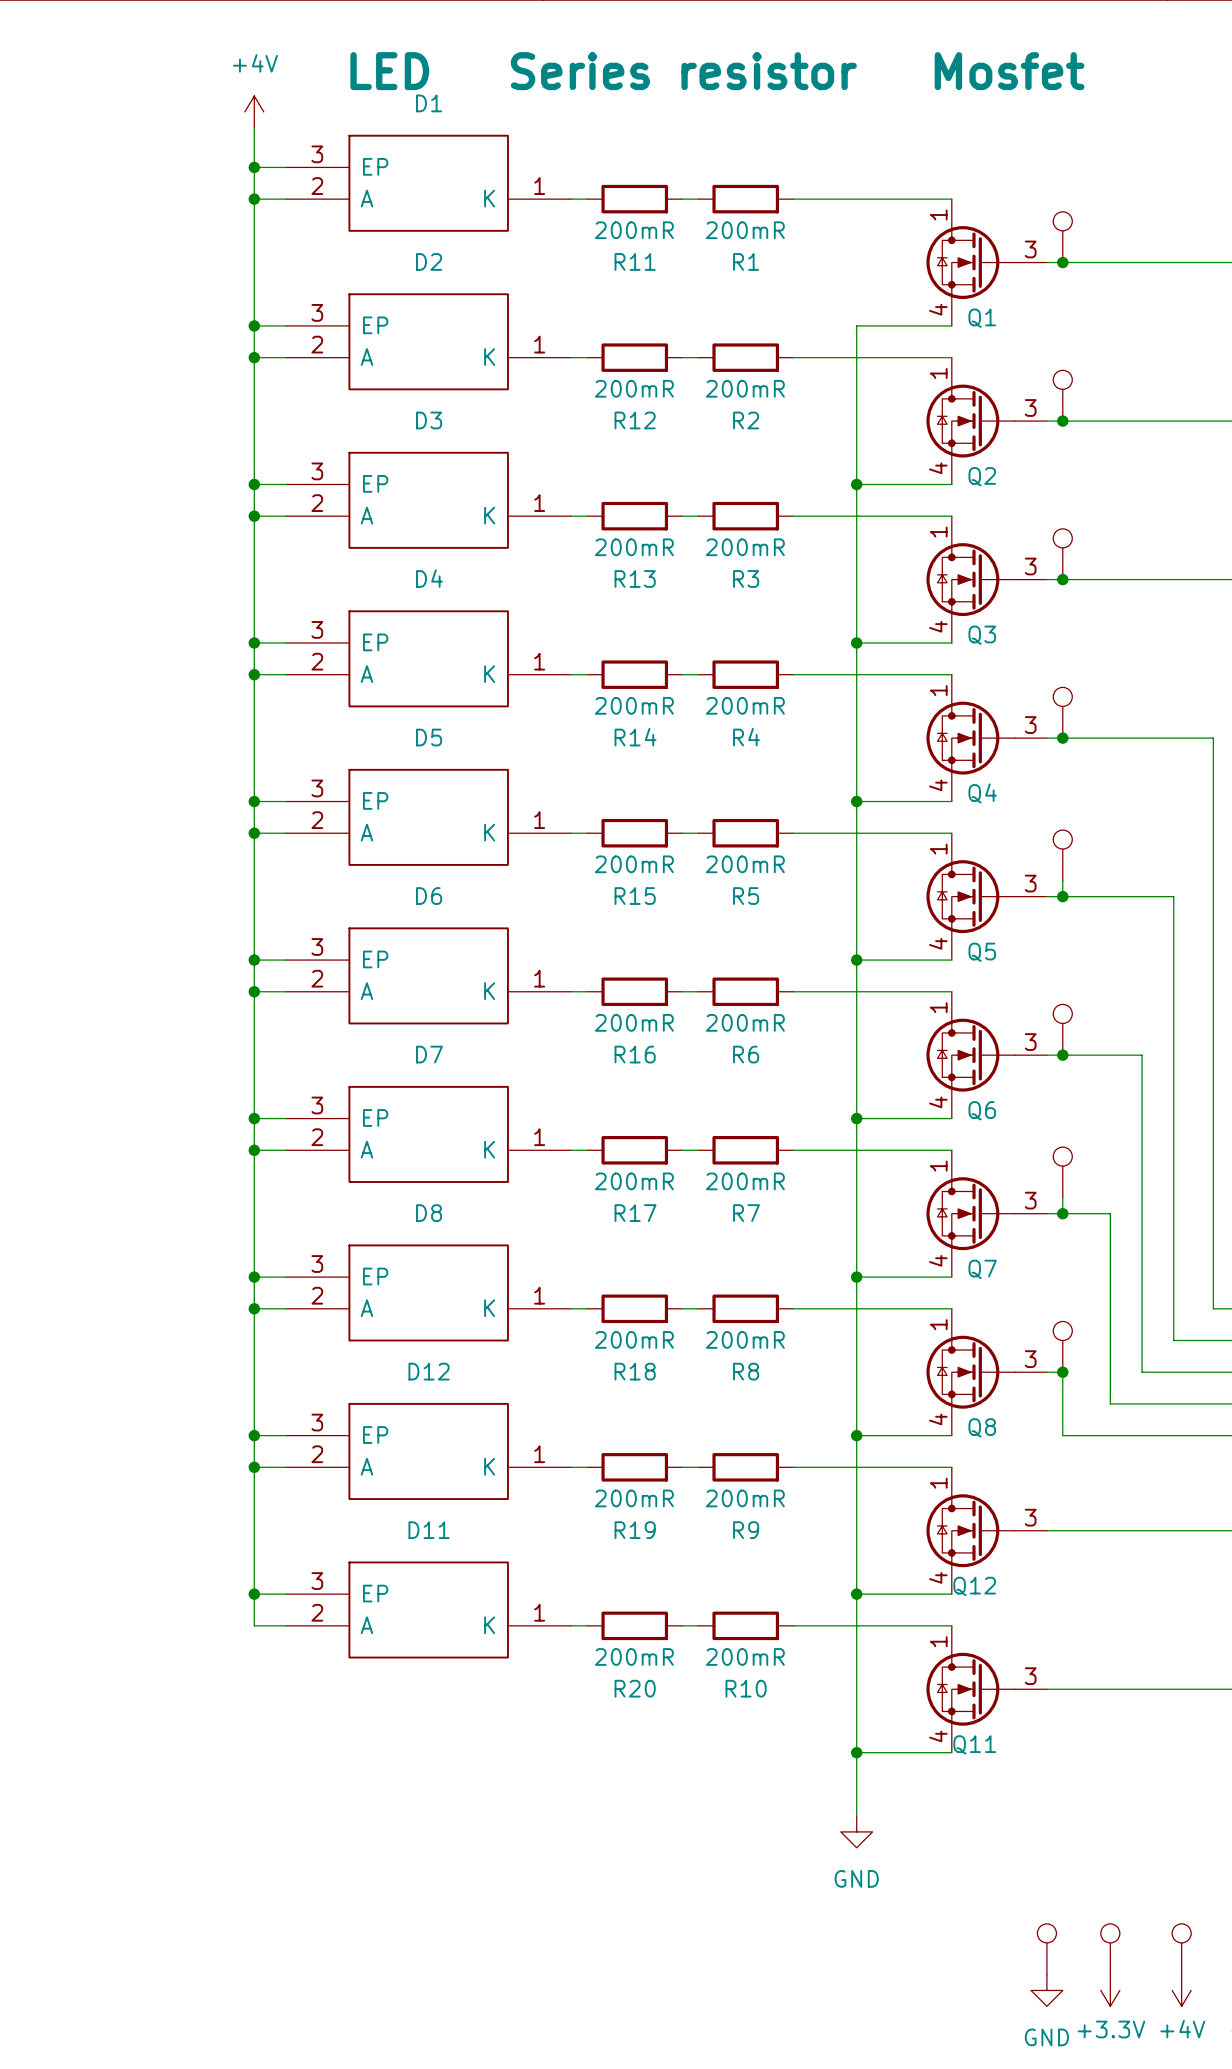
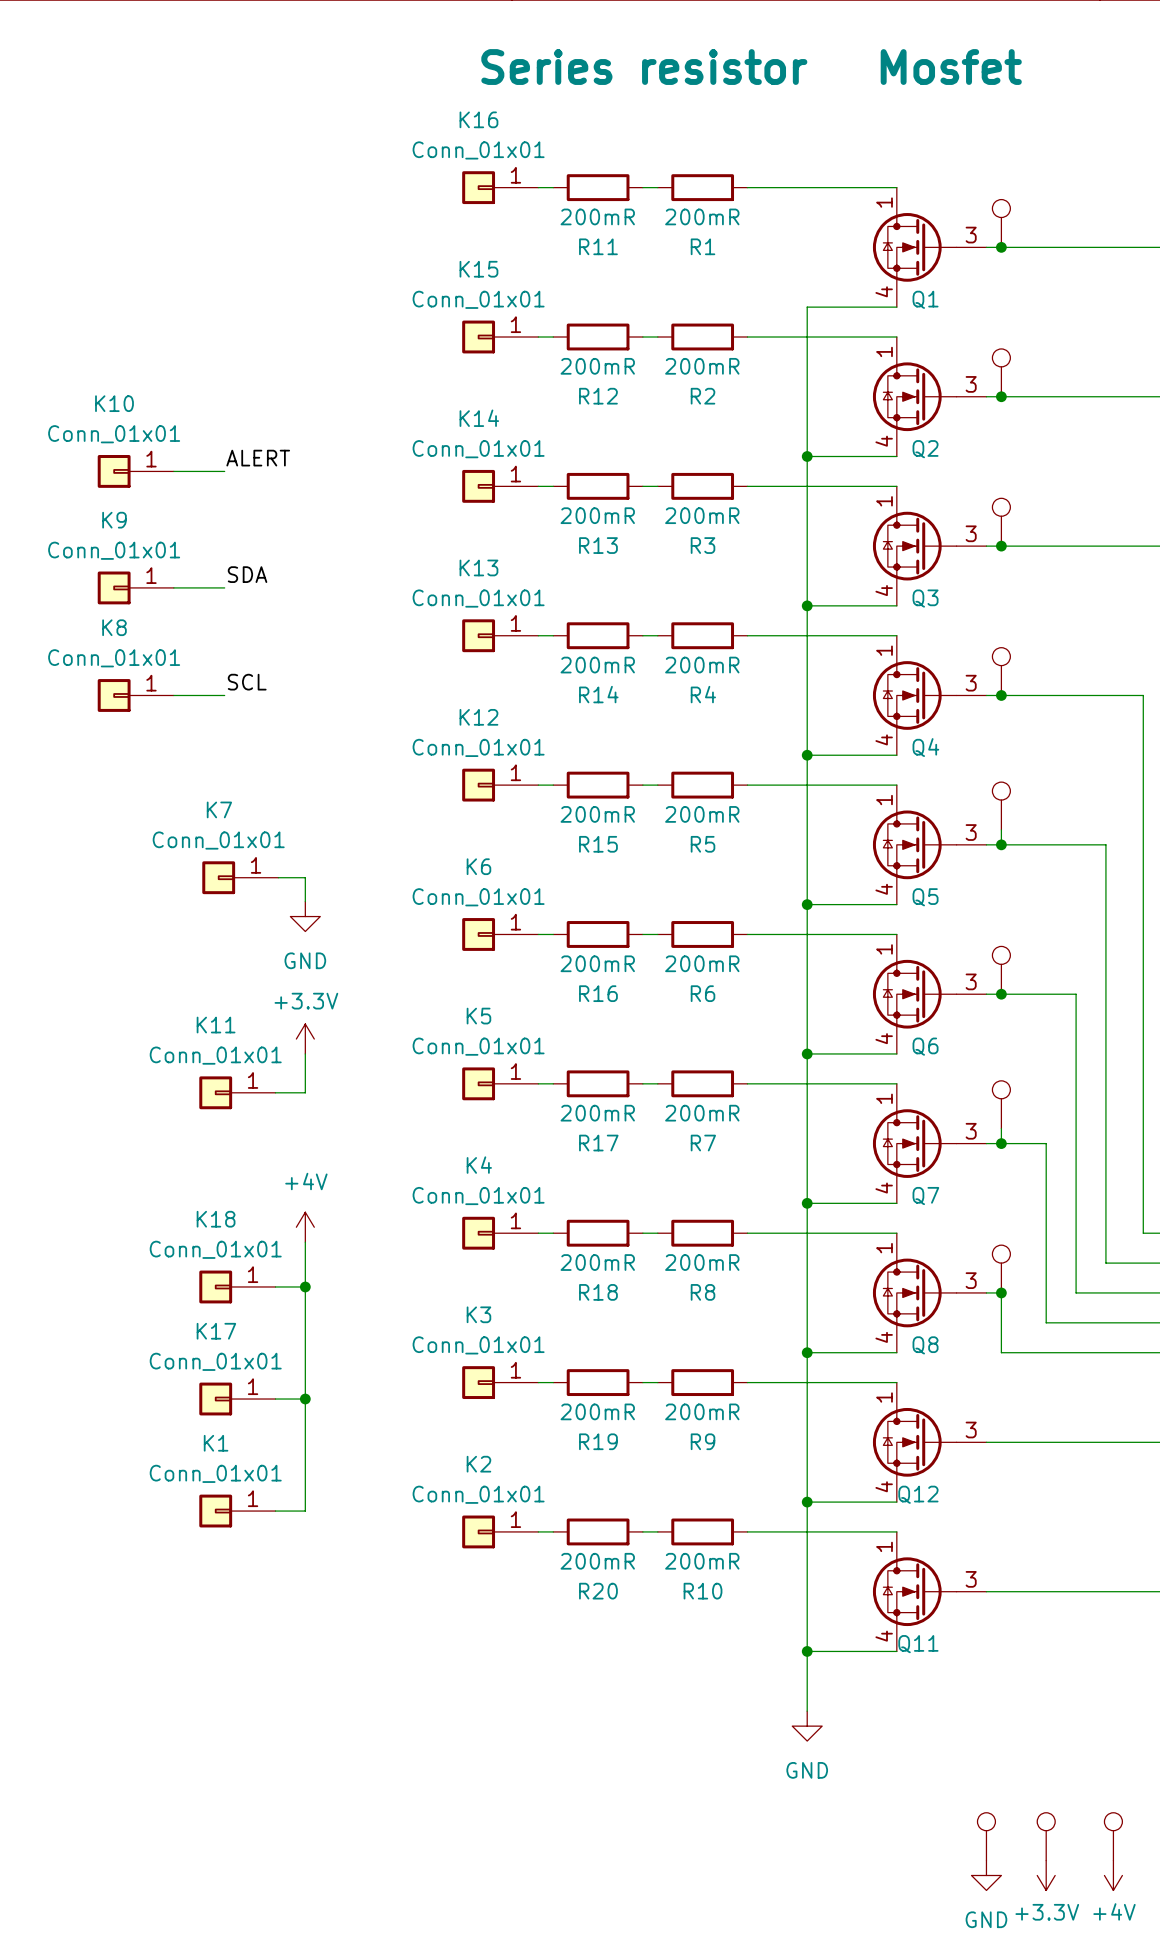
power symbol: +4V (254, 111) -> none
wire: (254, 127) (254, 1625) (286, 1625) -> none
wire: (254, 167) (286, 167) -> none
junction: (254, 167) -> none
D1: (428, 183) -> none
wire: (254, 199) (286, 199) -> none
junction: (254, 199) -> none
K16: none -> Conn_01x01 (500, 187)
wire: (254, 325) (286, 325) -> none
junction: (254, 325) -> none
D2: (428, 341) -> none
wire: (254, 357) (286, 357) -> none
junction: (254, 357) -> none
K15: none -> Conn_01x01 (500, 337)
wire: (254, 484) (286, 484) -> none
junction: (254, 484) -> none
label: none -> ALERT (258, 458)
K10: none -> Conn_01x01 (135, 471)
wire: none -> (173, 471) (224, 471)
D3: (428, 500) -> none
wire: (254, 516) (286, 516) -> none
junction: (254, 516) -> none
K14: none -> Conn_01x01 (500, 486)
label: none -> SDA (247, 574)
K9: none -> Conn_01x01 (135, 587)
wire: none -> (173, 587) (224, 587)
wire: (254, 643) (286, 643) -> none
junction: (254, 643) -> none
D4: (428, 658) -> none
wire: (254, 674) (286, 674) -> none
junction: (254, 674) -> none
K13: none -> Conn_01x01 (500, 635)
label: none -> SCL (247, 682)
K8: none -> Conn_01x01 (135, 695)
wire: none -> (173, 695) (224, 695)
wire: (254, 801) (286, 801) -> none
junction: (254, 801) -> none
D5: (428, 817) -> none
wire: (254, 833) (286, 833) -> none
junction: (254, 833) -> none
K12: none -> Conn_01x01 (500, 785)
K7: none -> Conn_01x01 (240, 877)
wire: none -> (278, 877) (305, 877) (305, 901)
wire: (254, 960) (286, 960) -> none
junction: (254, 960) -> none
power symbol: none -> GND (305, 916)
D6: (428, 975) -> none
wire: (254, 991) (286, 991) -> none
junction: (254, 991) -> none
K6: none -> Conn_01x01 (500, 934)
power symbol: none -> +3.3V (305, 1039)
wire: (254, 1118) (286, 1118) -> none
junction: (254, 1118) -> none
wire: none -> (305, 1053) (305, 1092) (275, 1092)
D7: (428, 1134) -> none
wire: (254, 1150) (286, 1150) -> none
junction: (254, 1150) -> none
K5: none -> Conn_01x01 (500, 1083)
K11: none -> Conn_01x01 (237, 1092)
wire: (254, 1277) (286, 1277) -> none
junction: (254, 1277) -> none
D8: (428, 1292) -> none
power symbol: none -> +4V (305, 1227)
wire: (254, 1308) (286, 1308) -> (275, 1286) (305, 1286)
junction: (254, 1308) -> none
K4: none -> Conn_01x01 (500, 1233)
wire: none -> (305, 1242) (305, 1511) (275, 1511)
K18: none -> Conn_01x01 (237, 1286)
junction: none -> (305, 1286)
wire: (254, 1435) (286, 1435) -> none
junction: (254, 1435) -> none
D12: (428, 1451) -> none
wire: (254, 1467) (286, 1467) -> (275, 1399) (305, 1399)
junction: (254, 1467) -> none
K3: none -> Conn_01x01 (500, 1382)
K17: none -> Conn_01x01 (237, 1399)
junction: none -> (305, 1399)
wire: (254, 1594) (286, 1594) -> none
junction: (254, 1594) -> none
K1: none -> Conn_01x01 (237, 1511)
D11: (428, 1610) -> none
K2: none -> Conn_01x01 (500, 1531)

